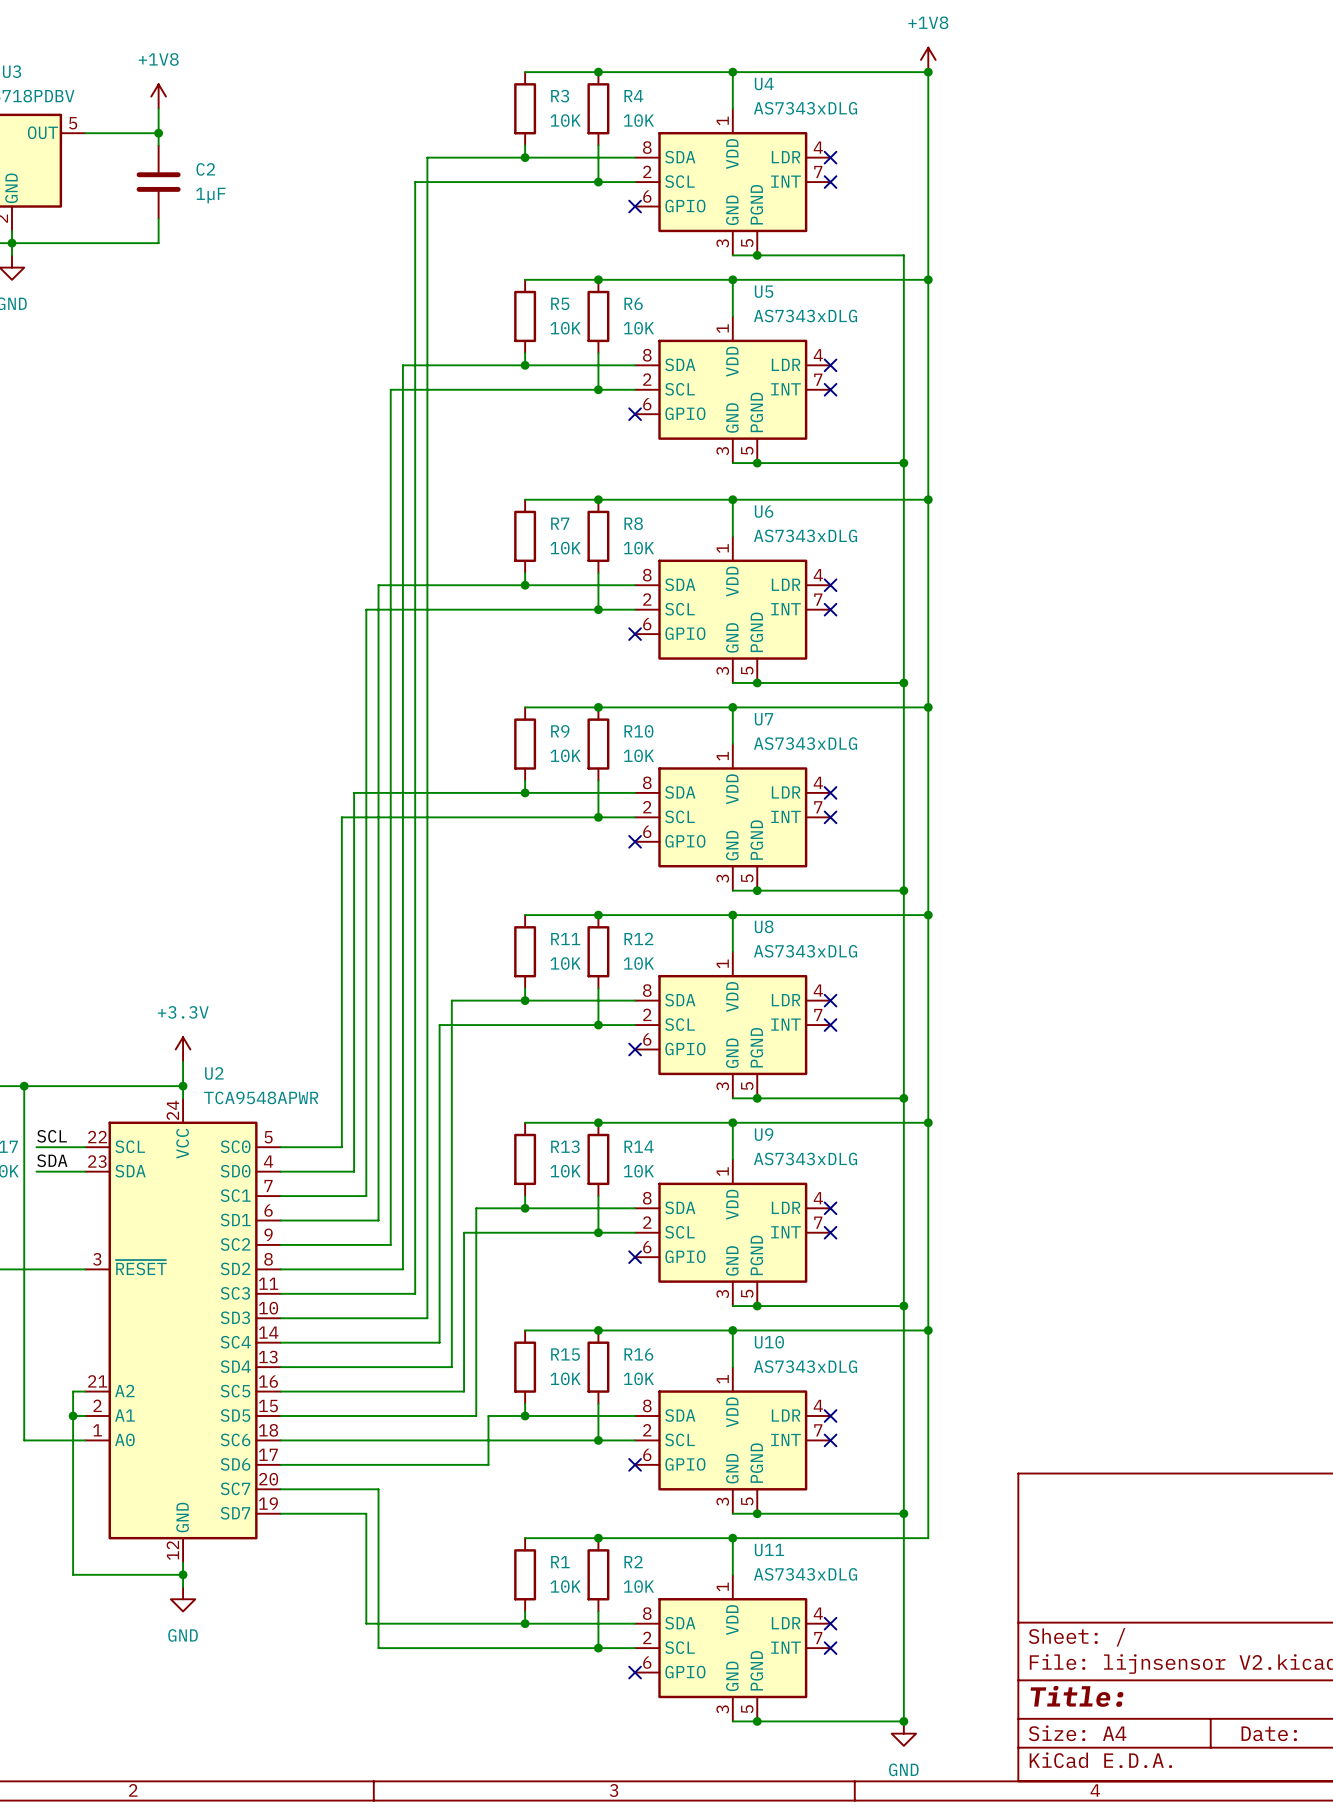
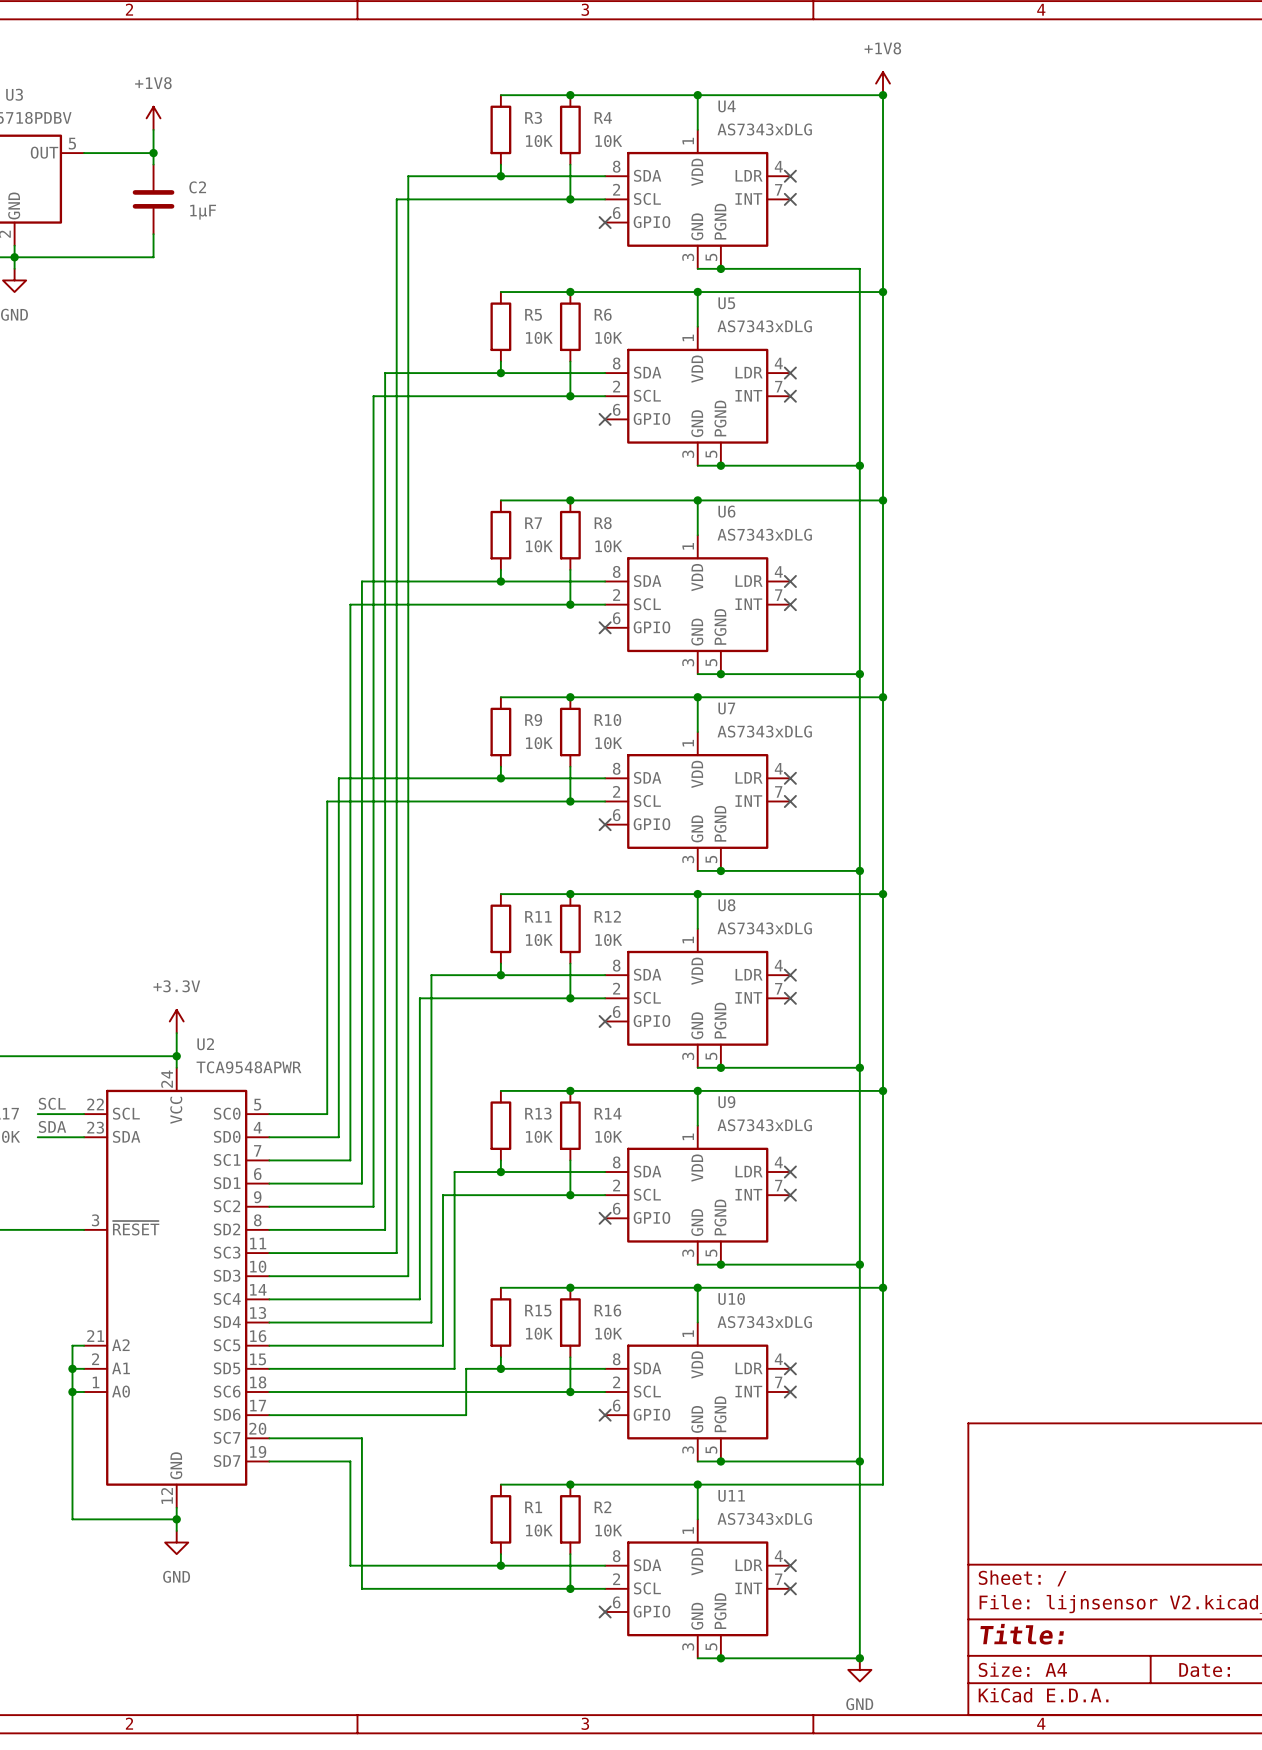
wire: (24, 1086) (24, 1440) (73, 1440) -> none
junction: (24, 1086) -> none
junction: none -> (72, 1392)

